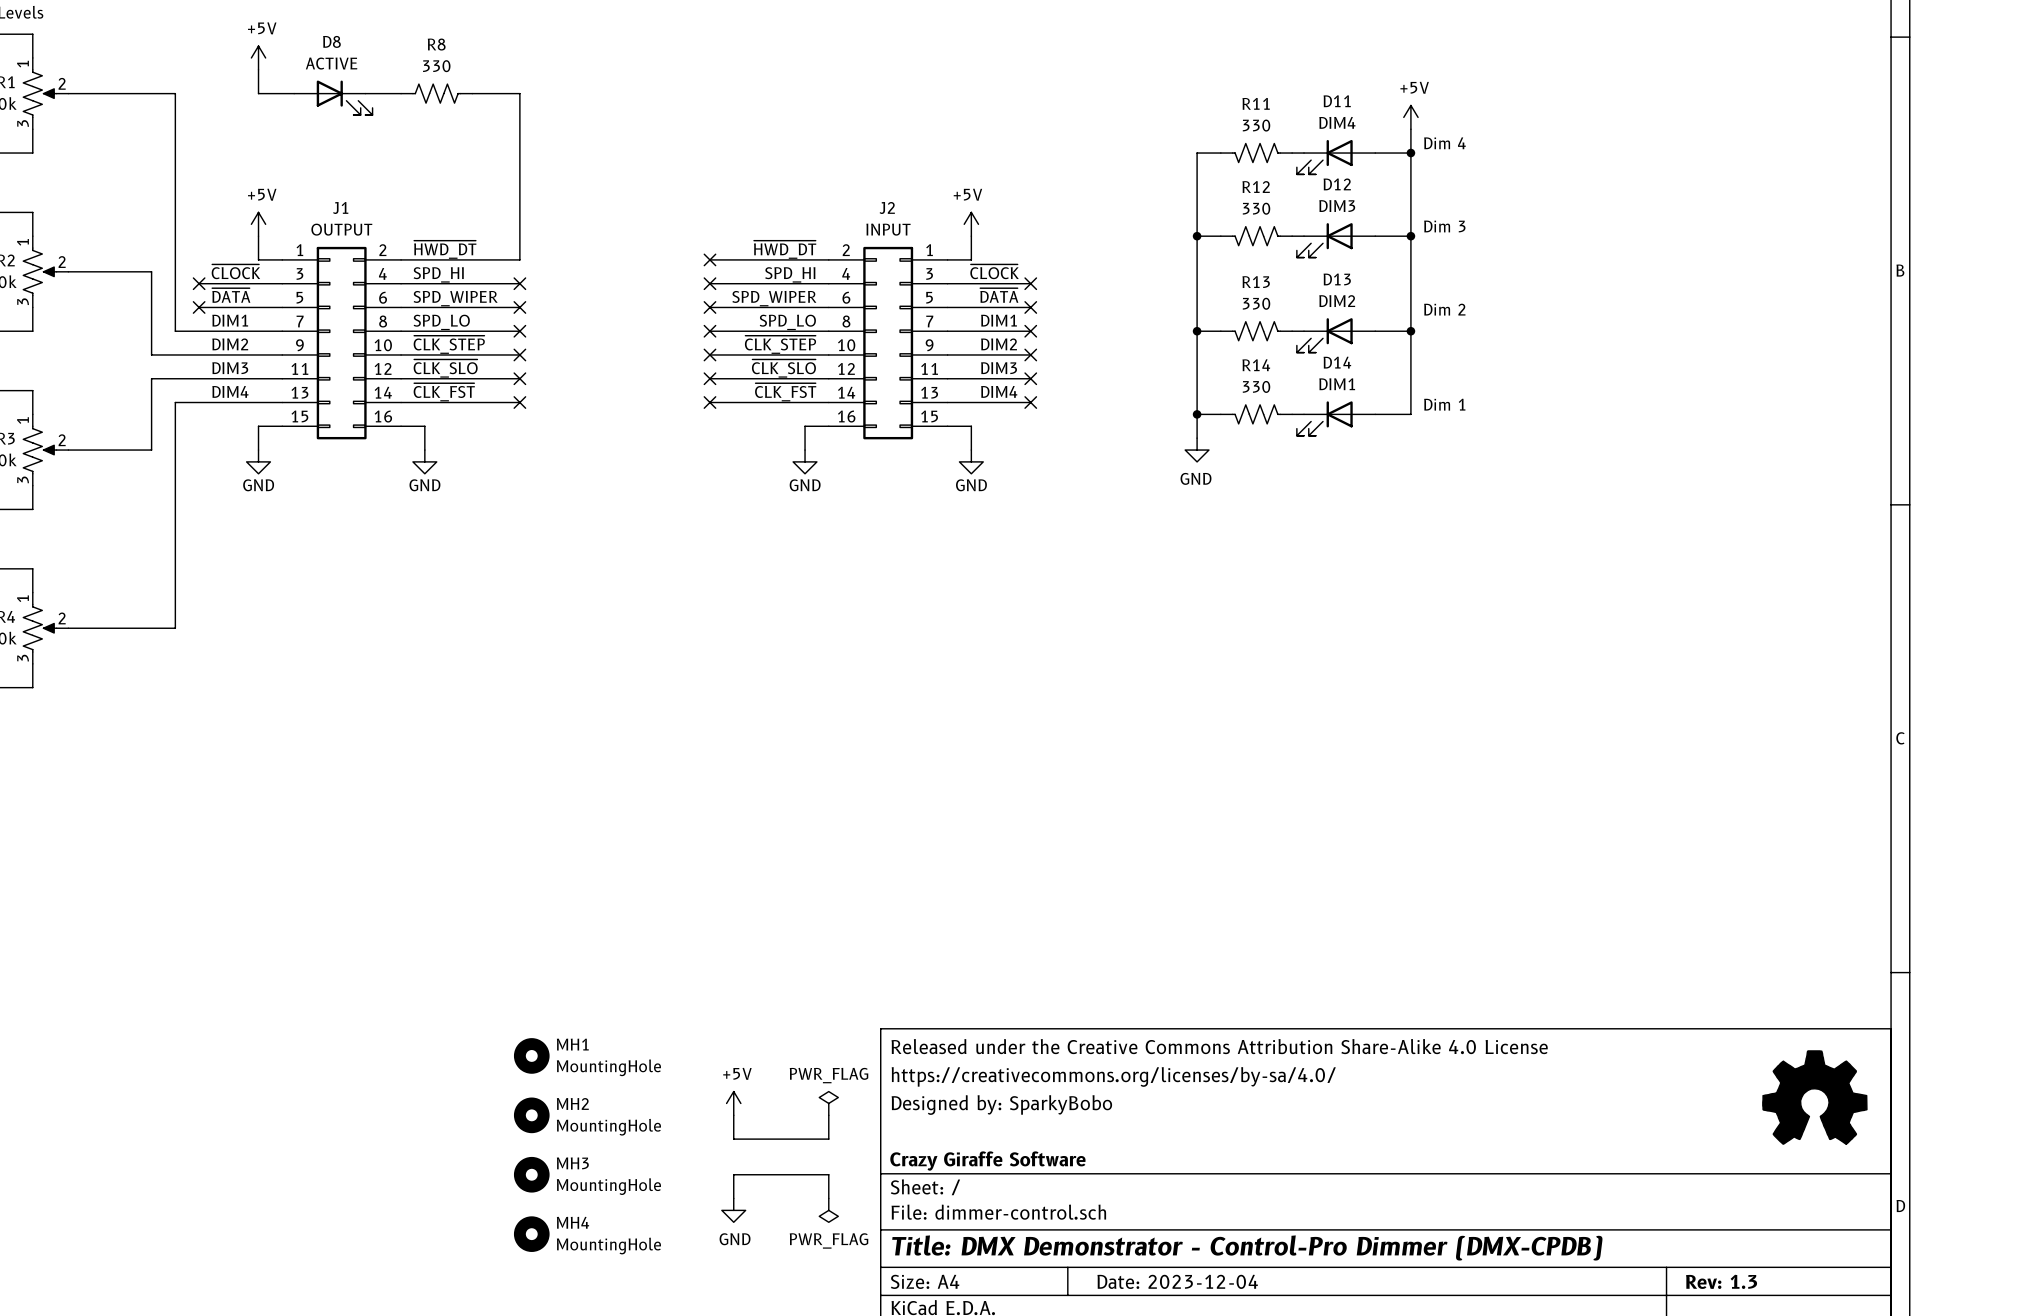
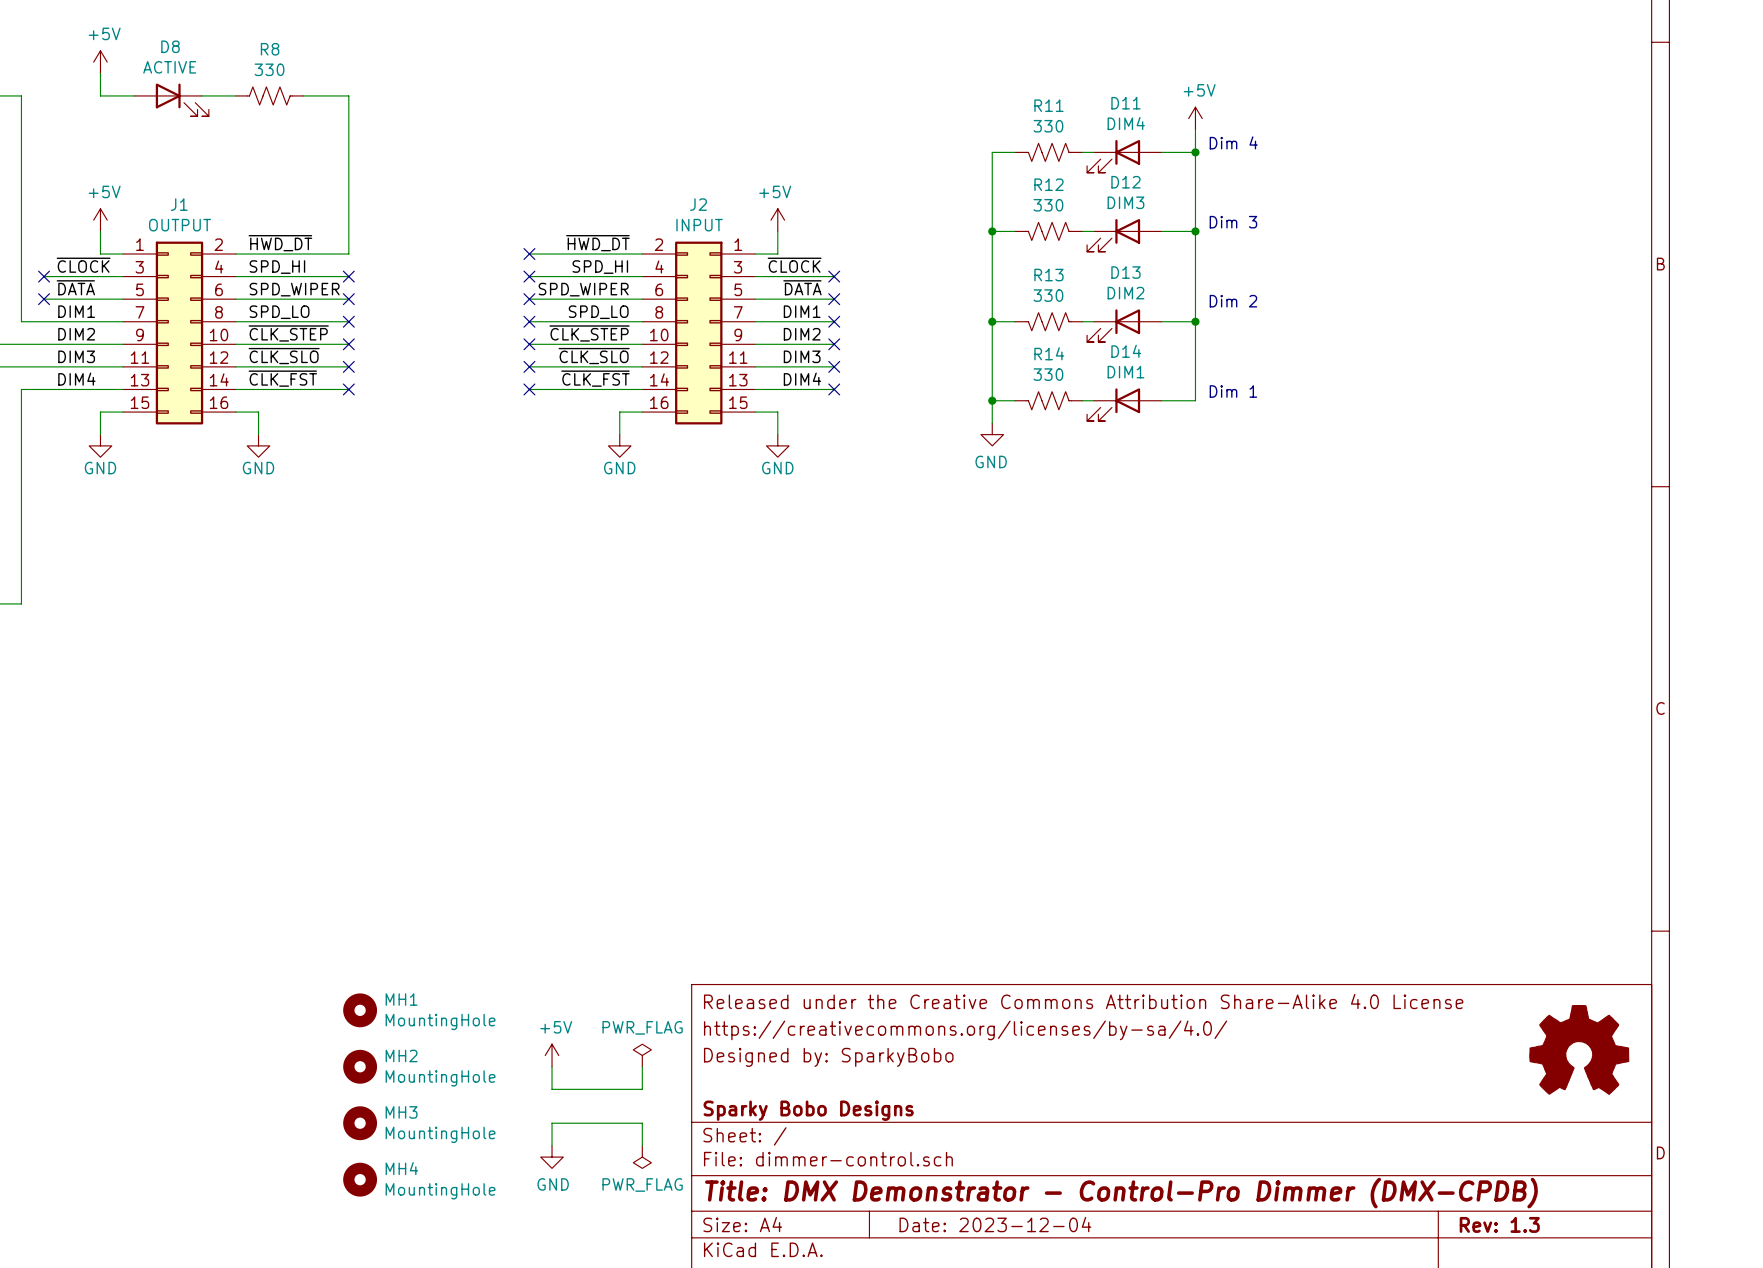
title block: Crazy Giraffe Software (987, 1161) -> Sparky Bobo Designs (808, 1110)

